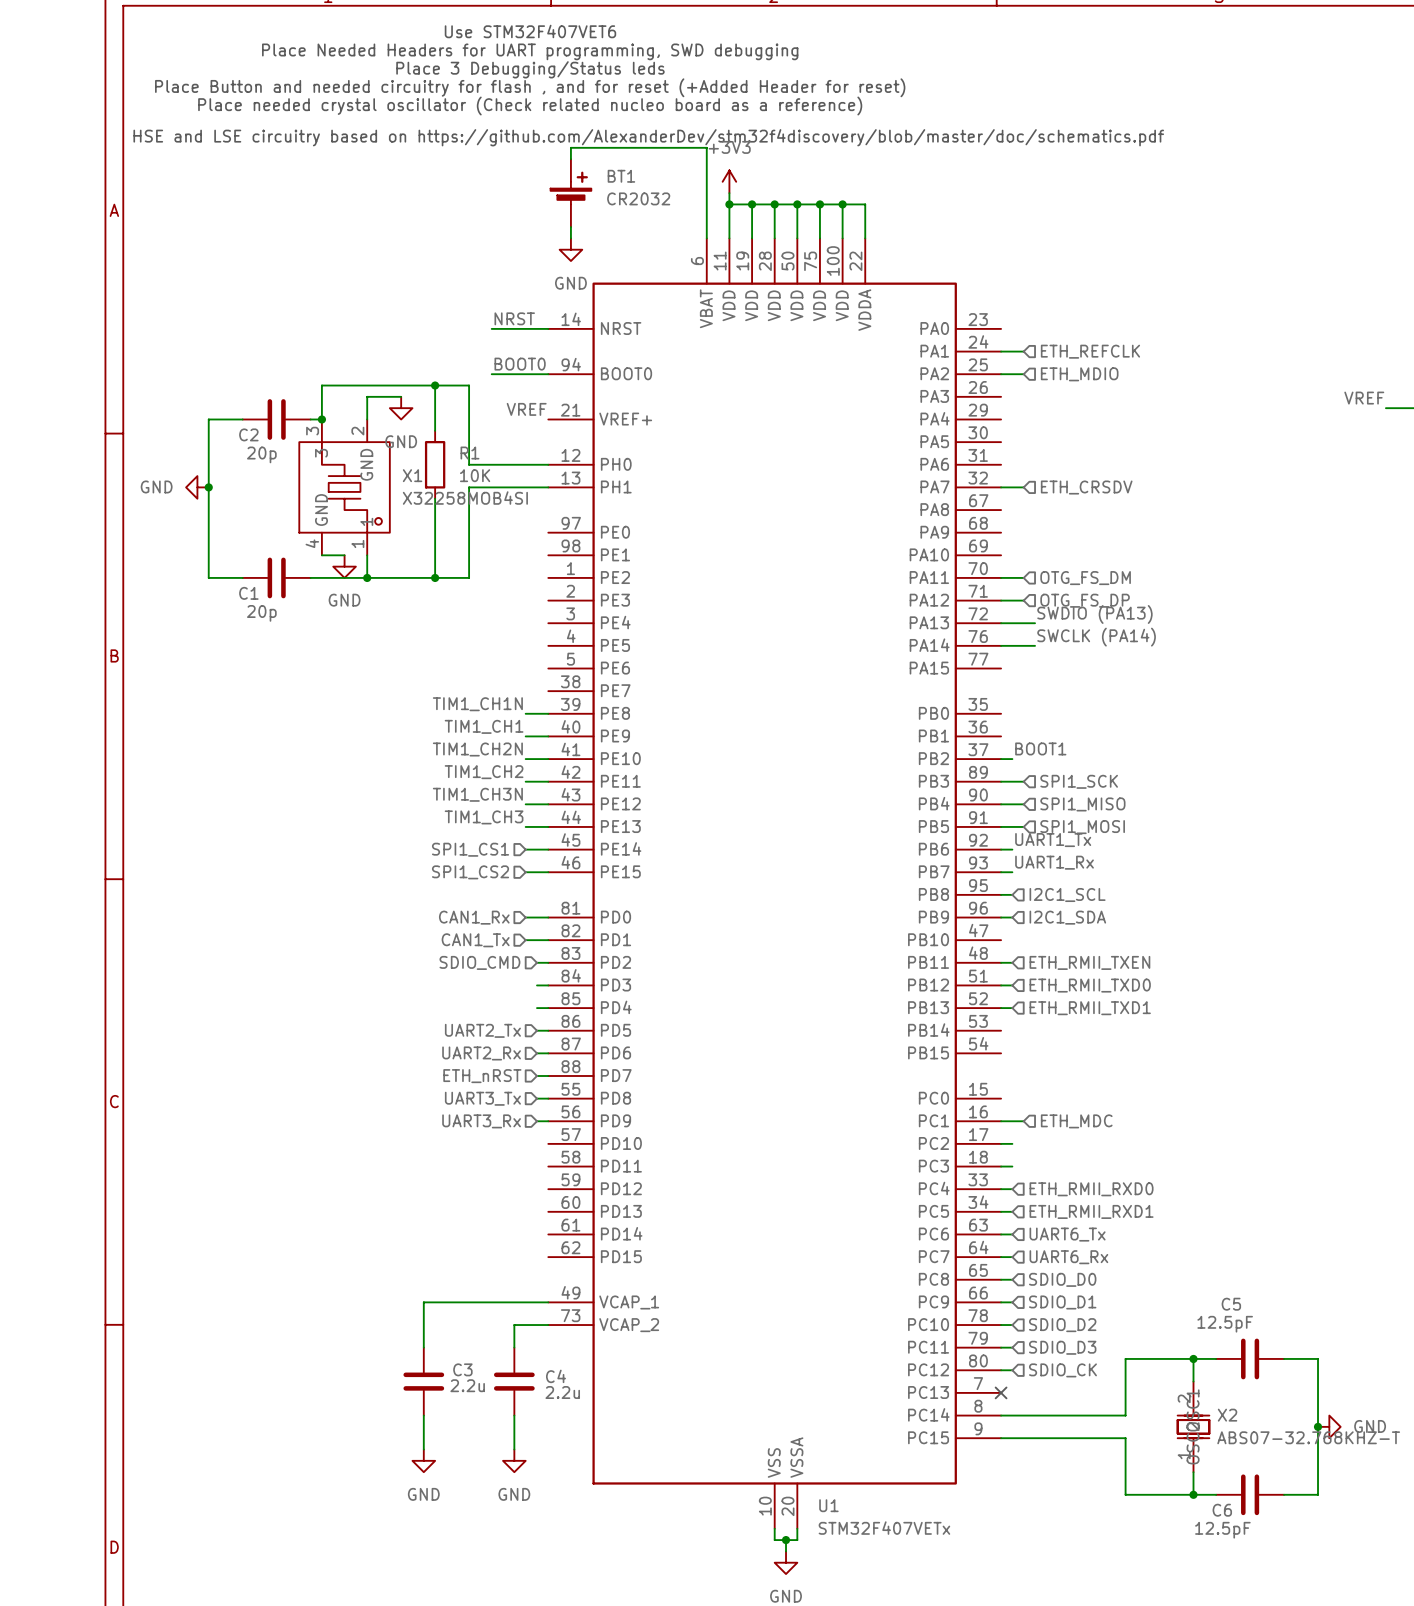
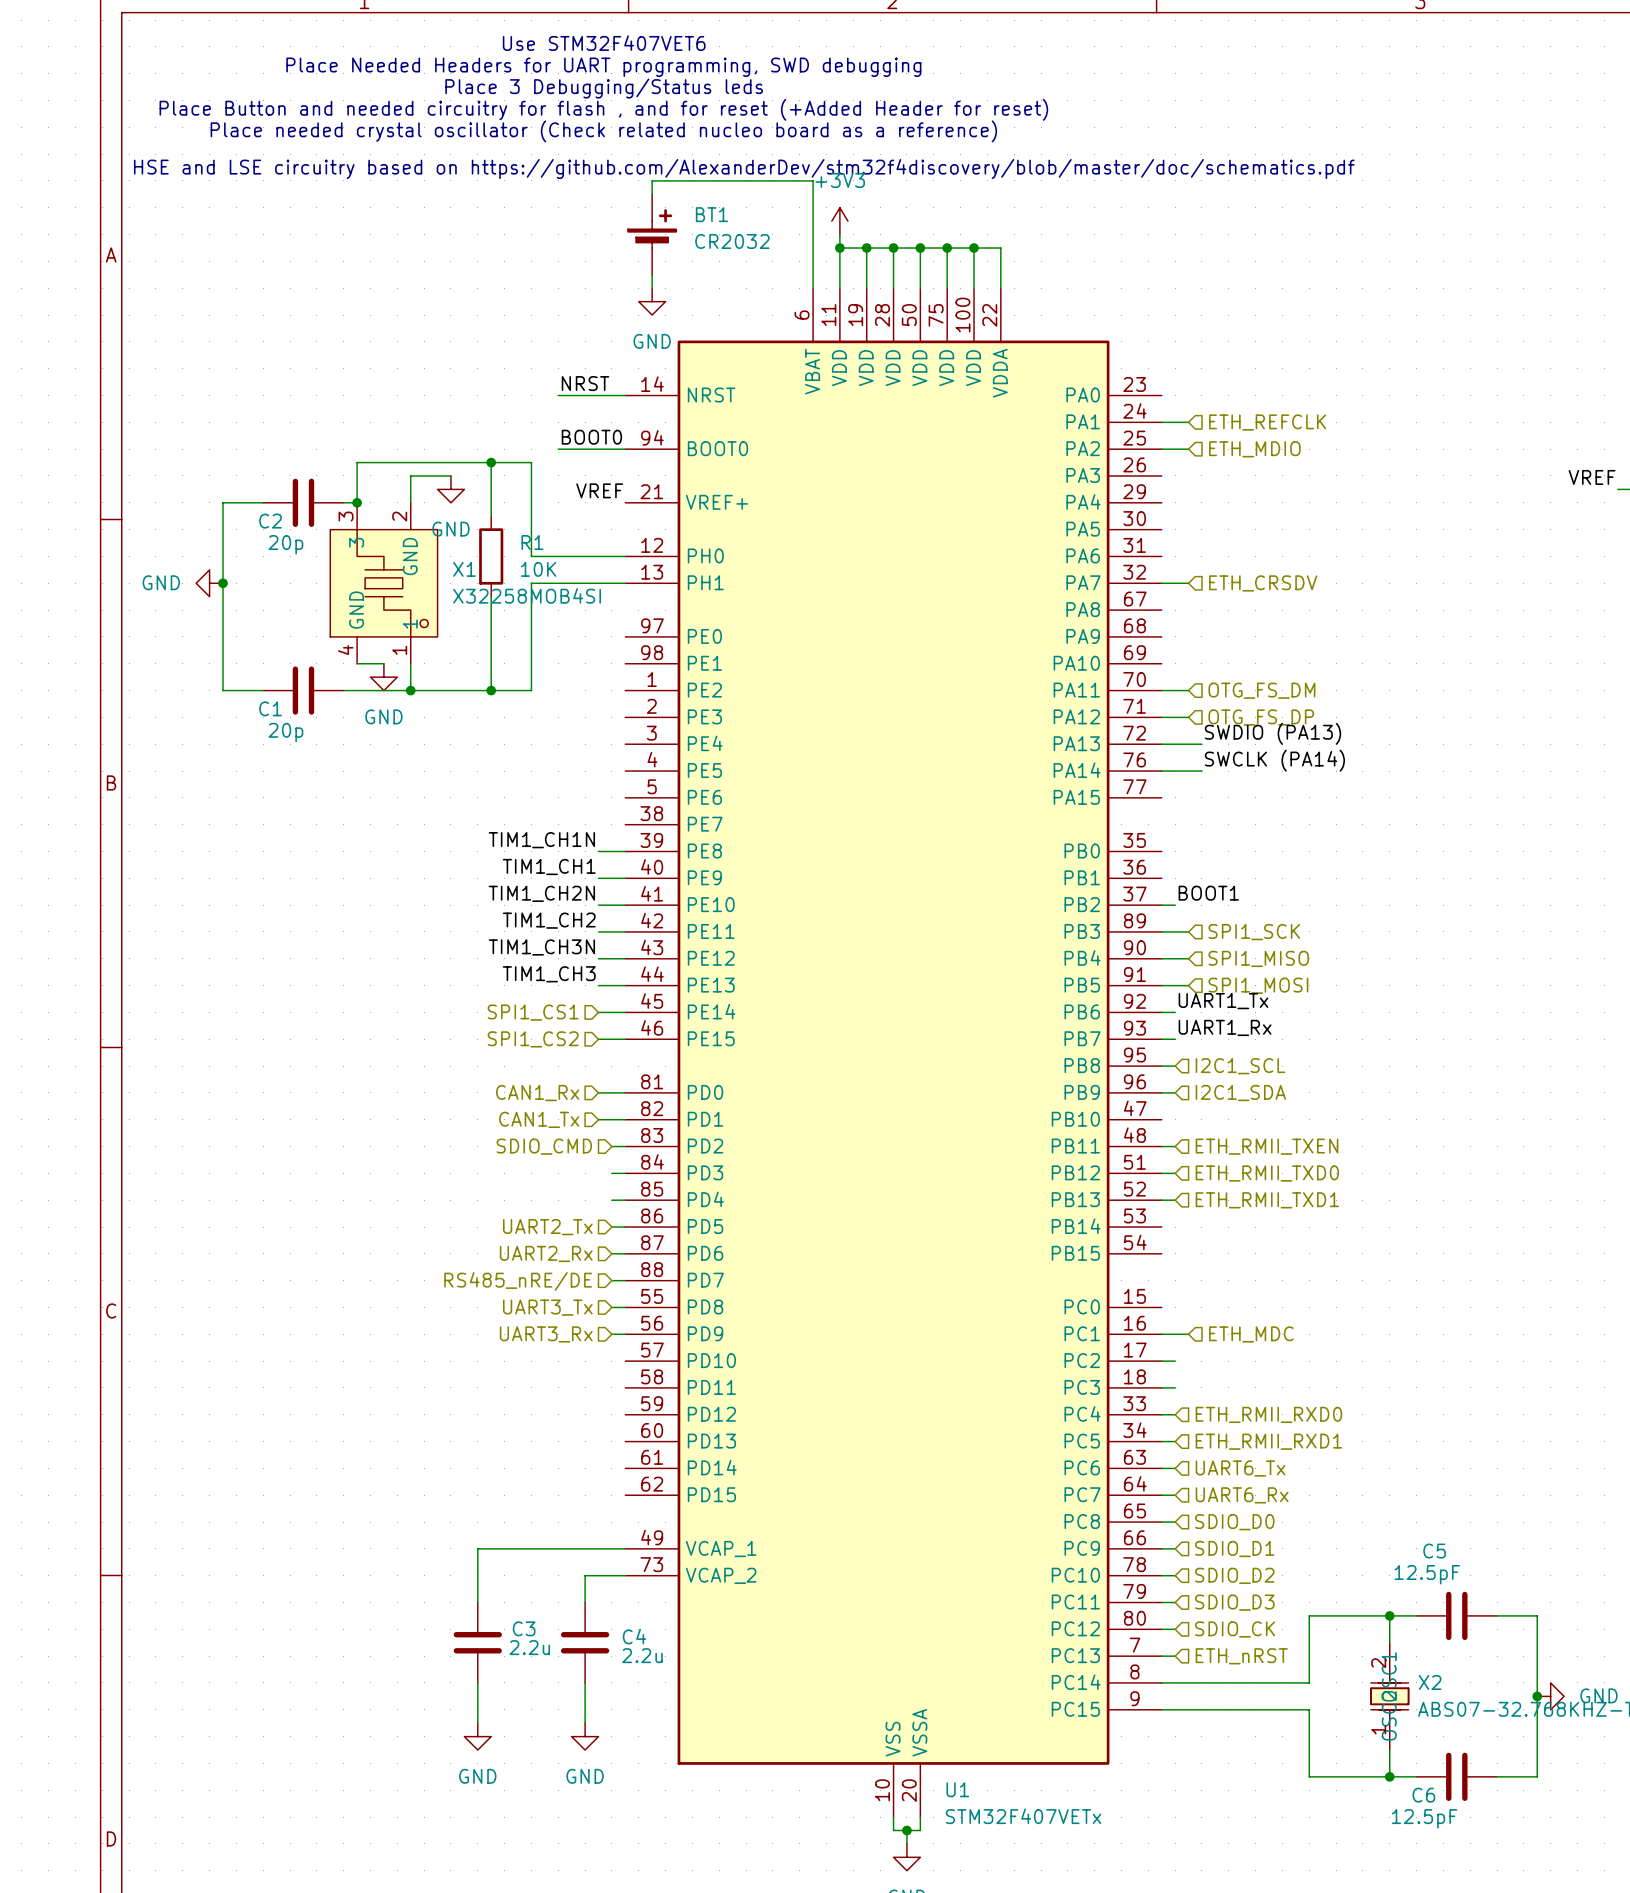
hierarchical label: ETH_nRST (482, 1076) -> RS485_nRE/DE (518, 1281)
wire: none -> (1161, 1656) (1175, 1656)
no-connect mark: (1001, 1392) -> none
hierarchical label: none -> ETH_nRST (1241, 1656)

